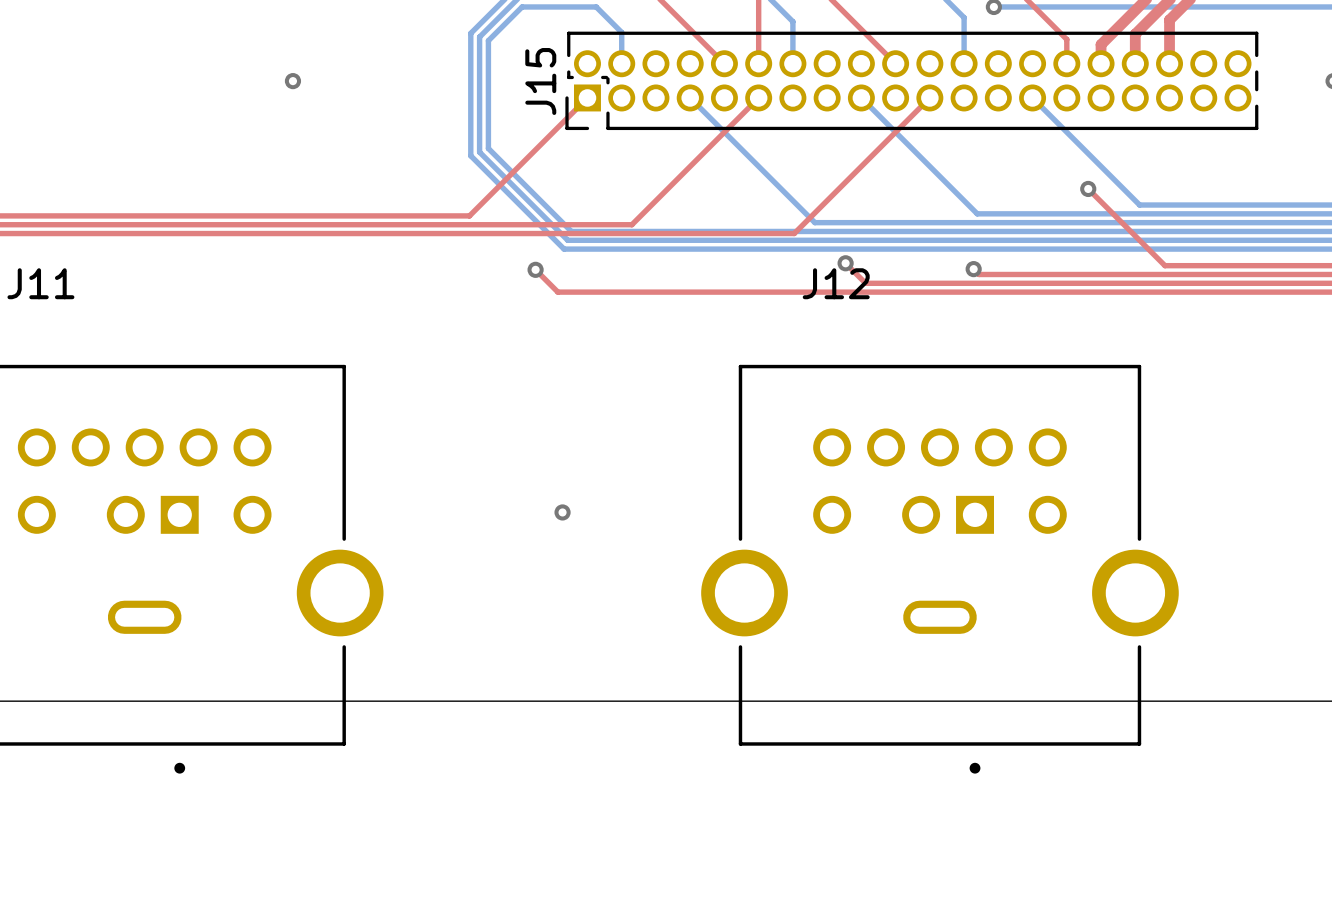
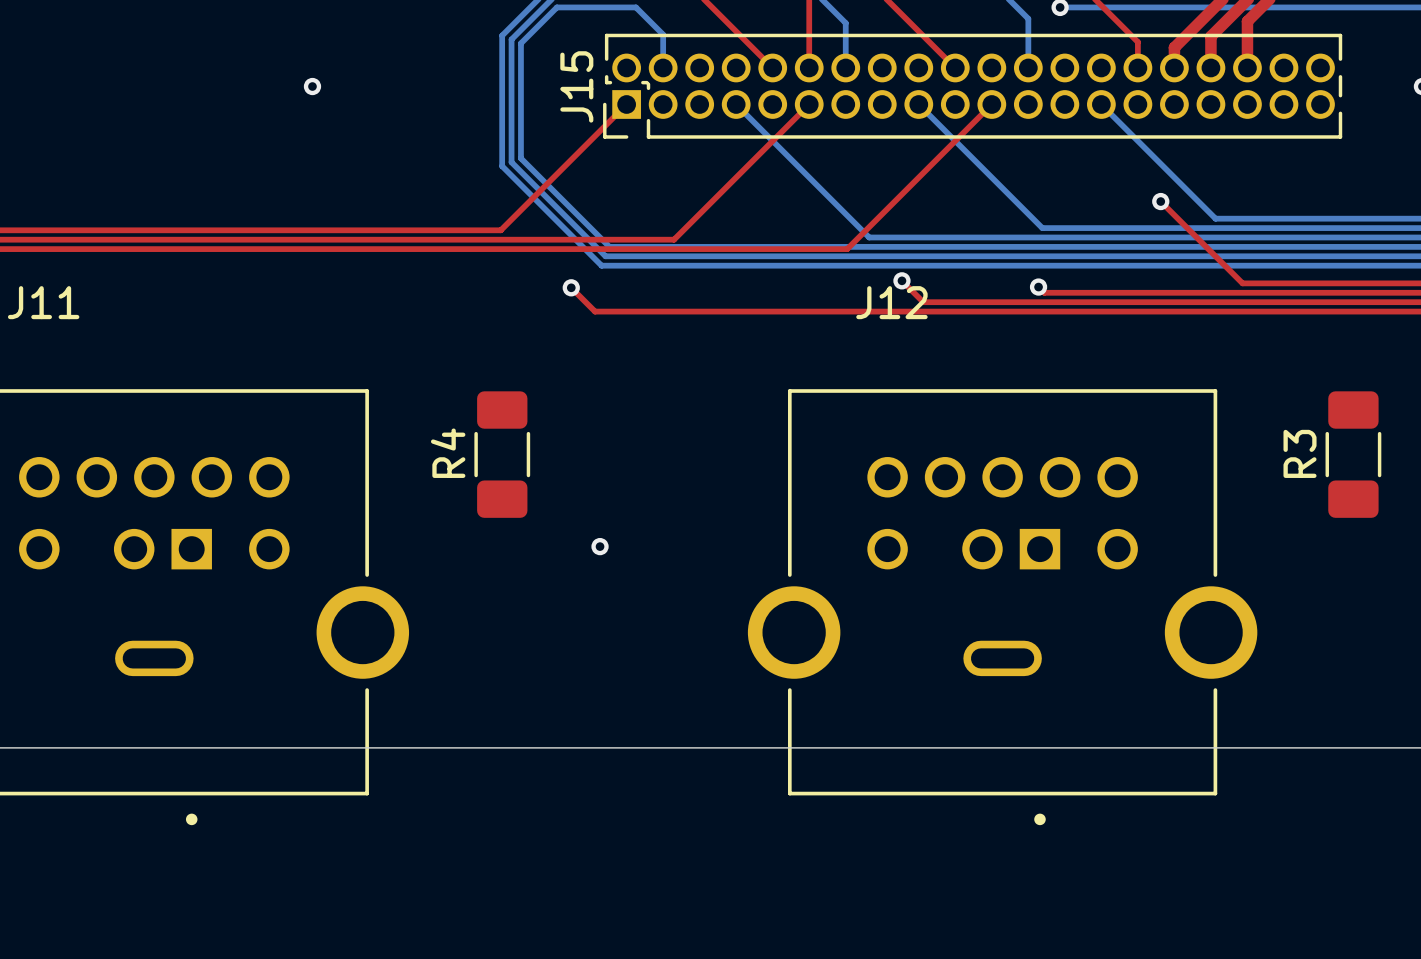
R4: none -> (502, 454)
R3: none -> (1353, 454)

